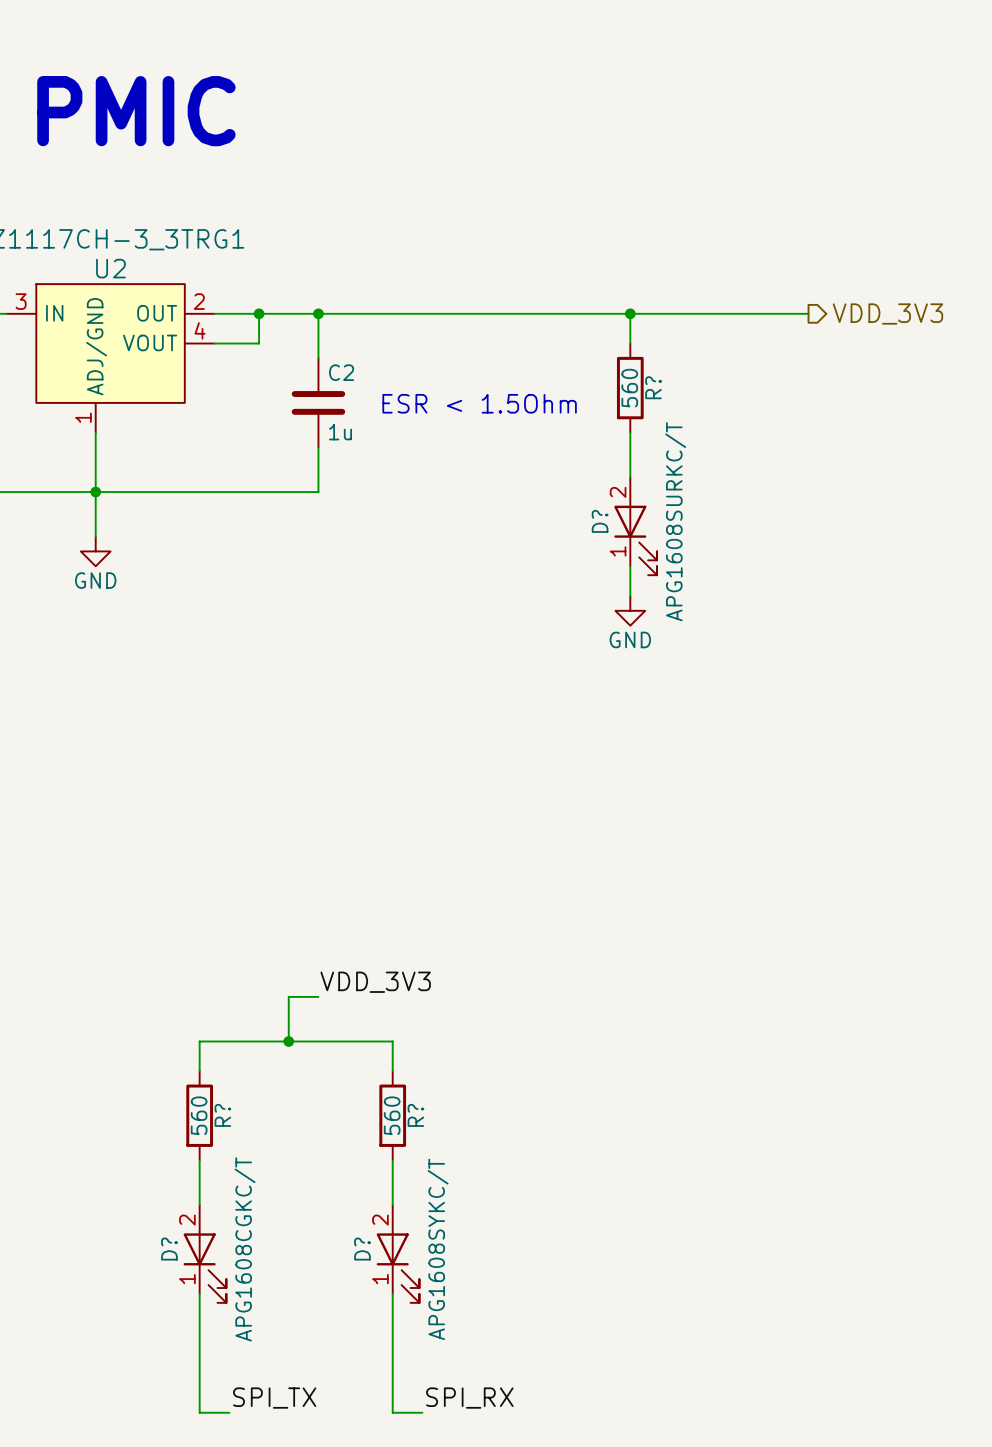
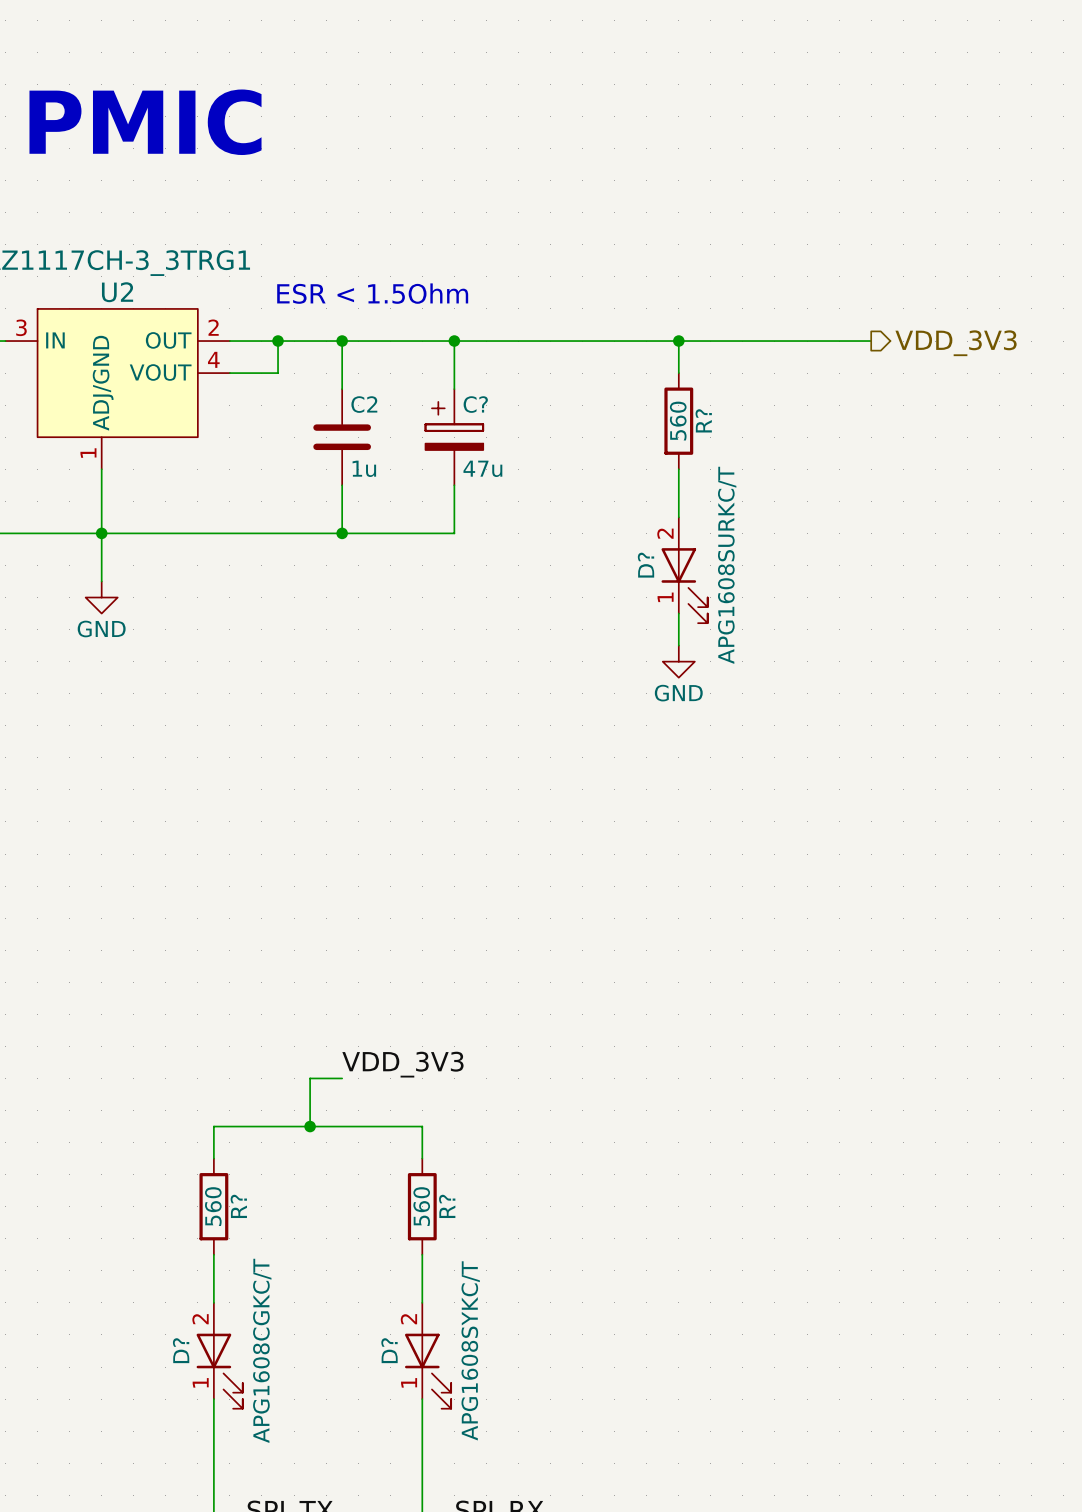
wire: none -> (454, 341) (454, 389)
junction: none -> (454, 341)
C?: none -> 47u (454, 437)
text position: ESR < 1.5Ohm (479, 403) -> ESR < 1.5Ohm (372, 293)
wire: none -> (454, 485) (454, 533) (342, 533)
junction: none -> (342, 533)

